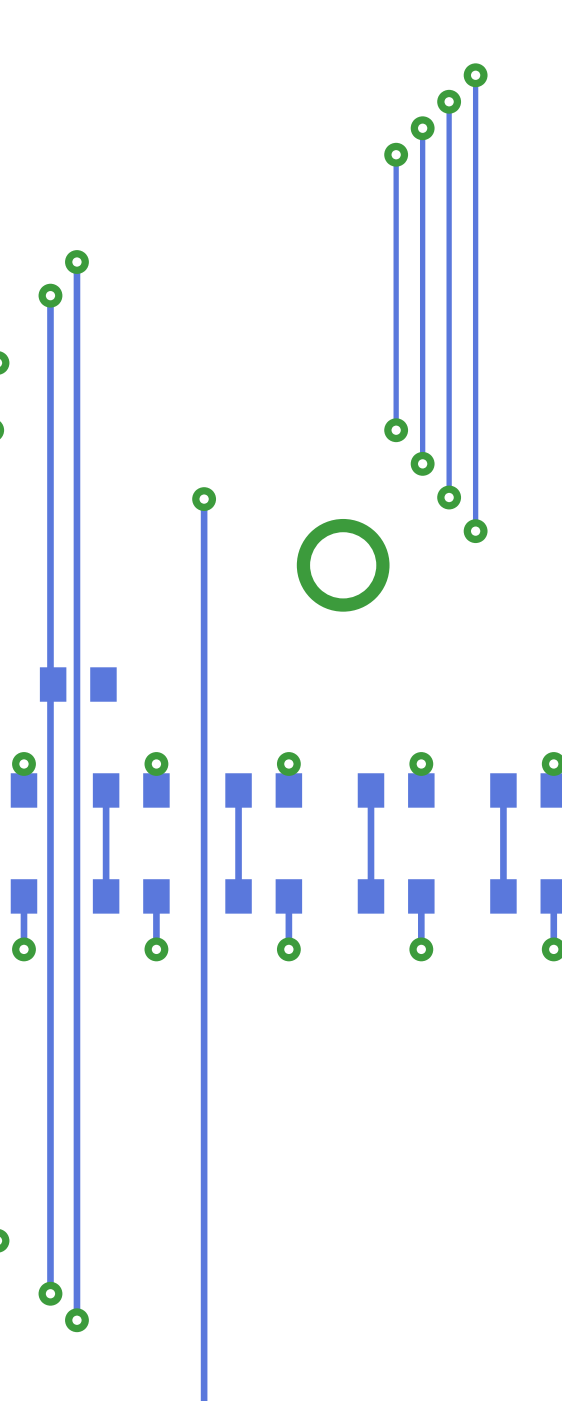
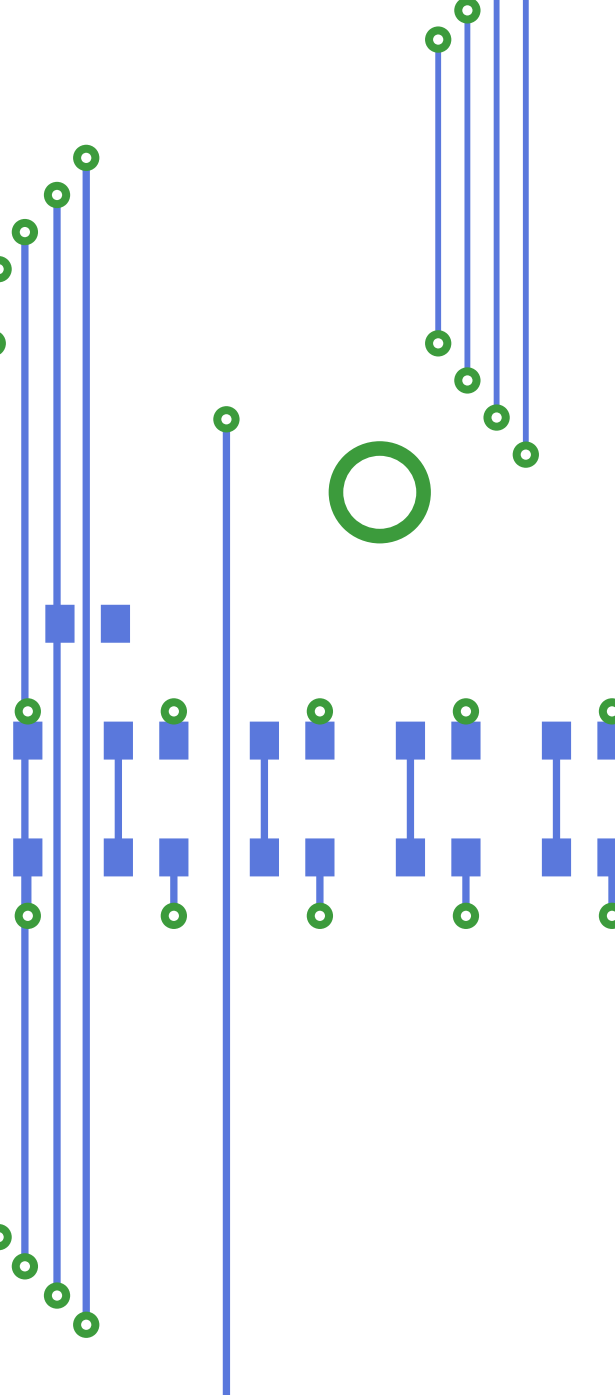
track: none -> (24, 232) (24, 1266)
via: none -> (24, 232)
via: none -> (24, 1266)

